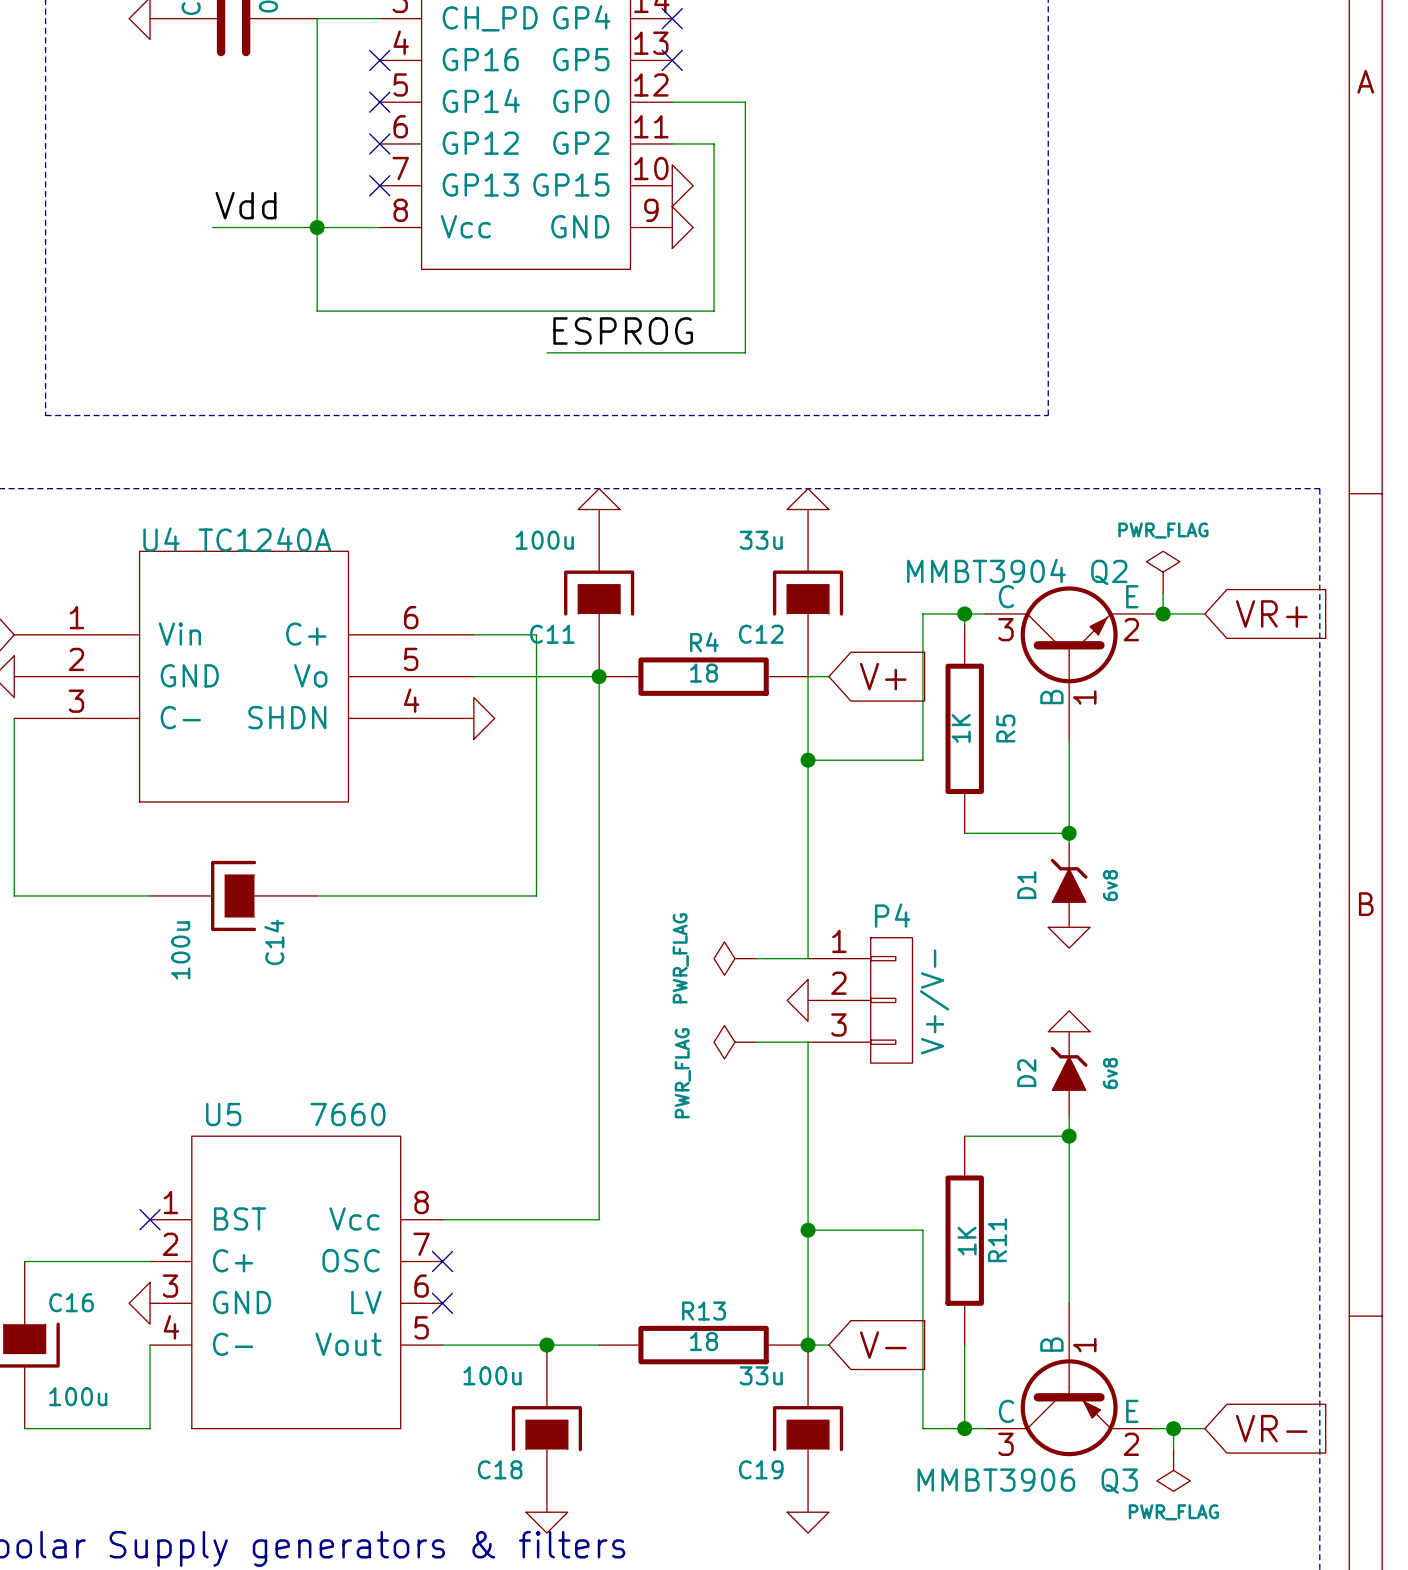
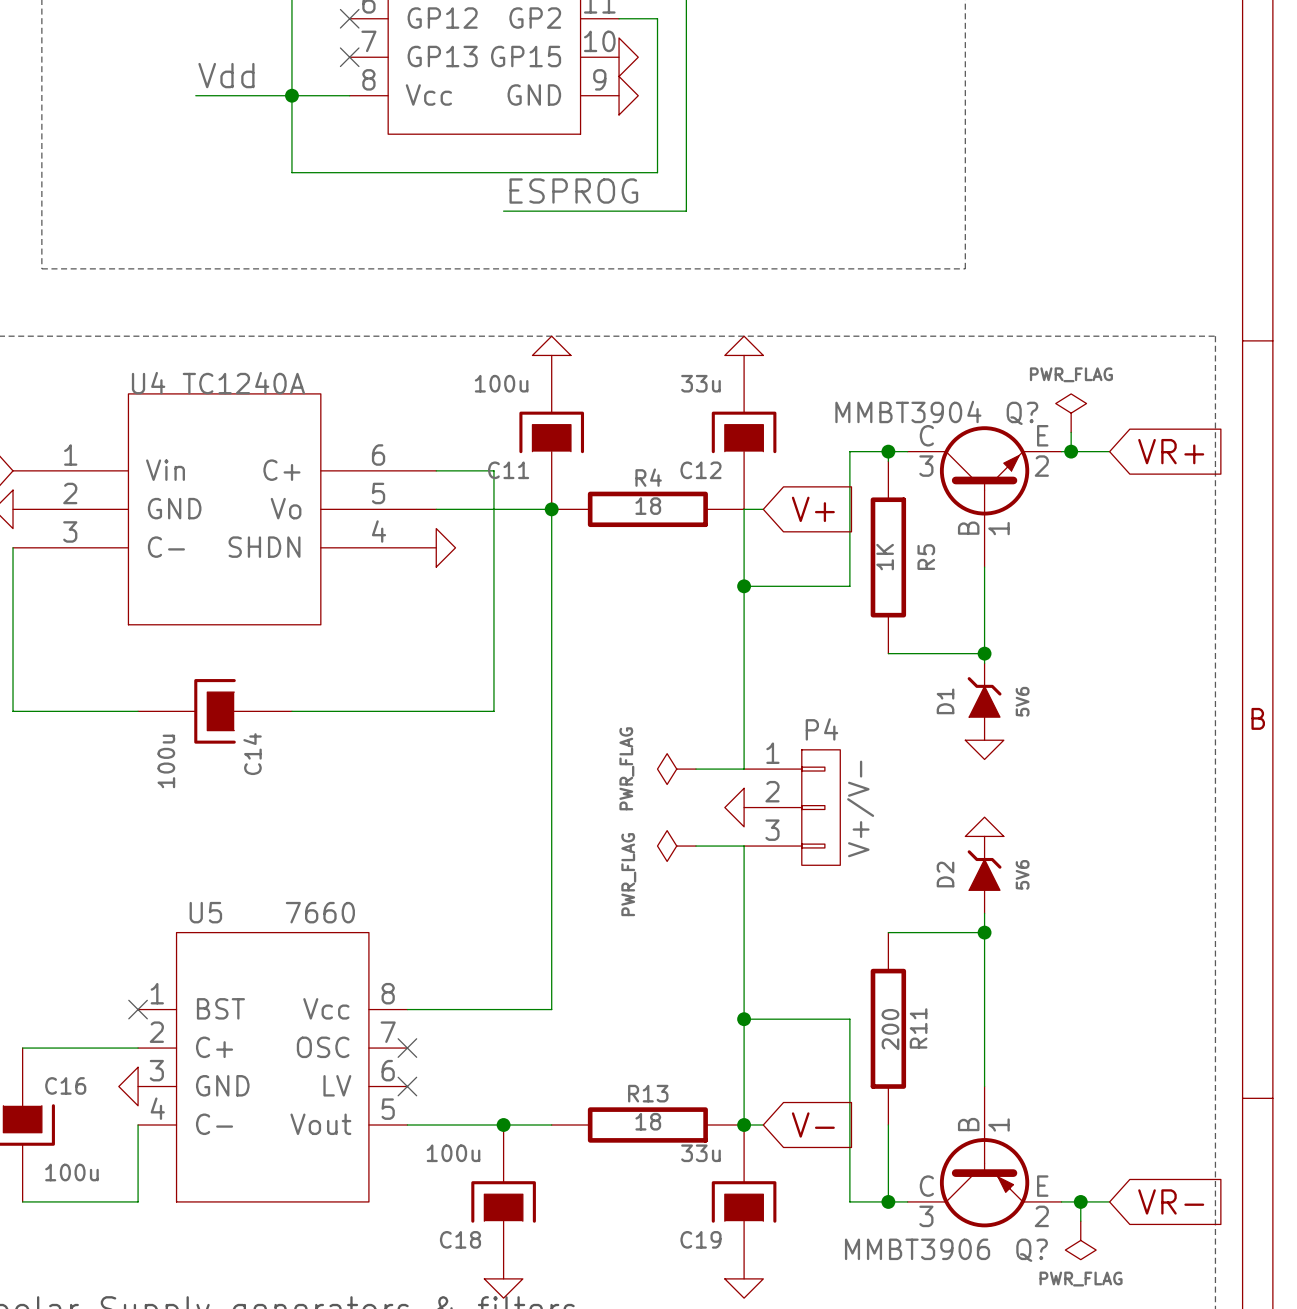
Q2 name: Q2 (1109, 572) -> Q? (1022, 413)
D1 value: 6v8 (1110, 885) -> 5V6 (1022, 701)
D2 value: 6v8 (1110, 1073) -> 5V6 (1022, 874)
R11 value: 1K (967, 1241) -> 200 (890, 1029)
Q3 name: Q3 (1119, 1481) -> Q? (1032, 1250)

